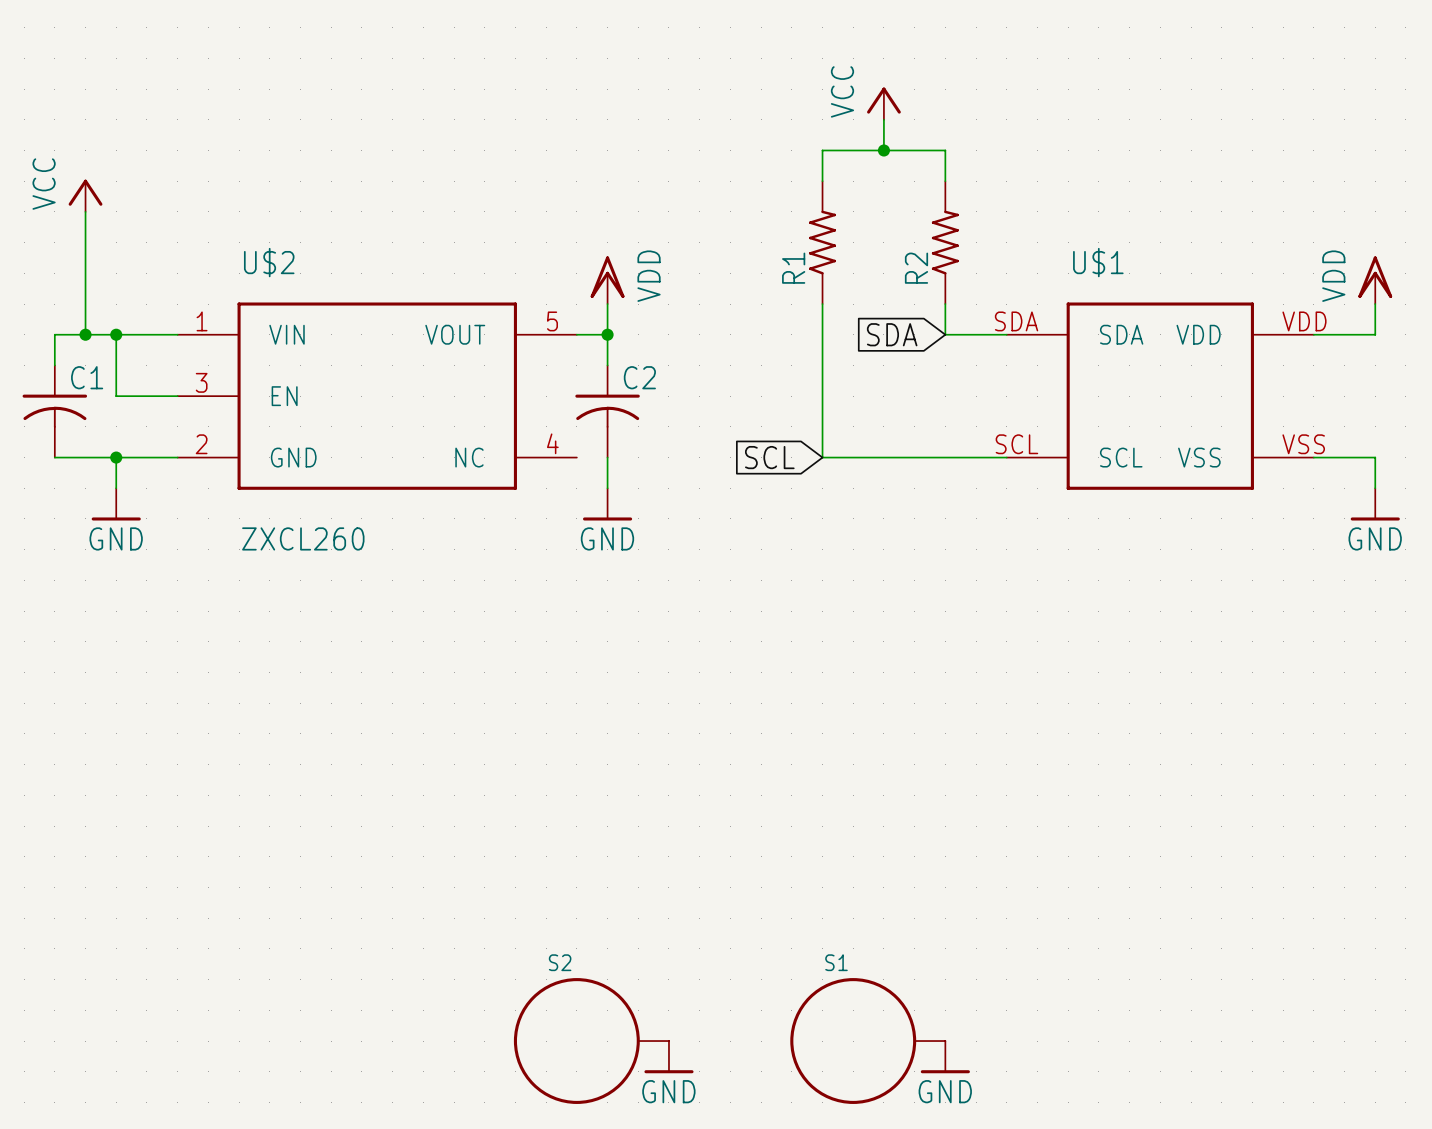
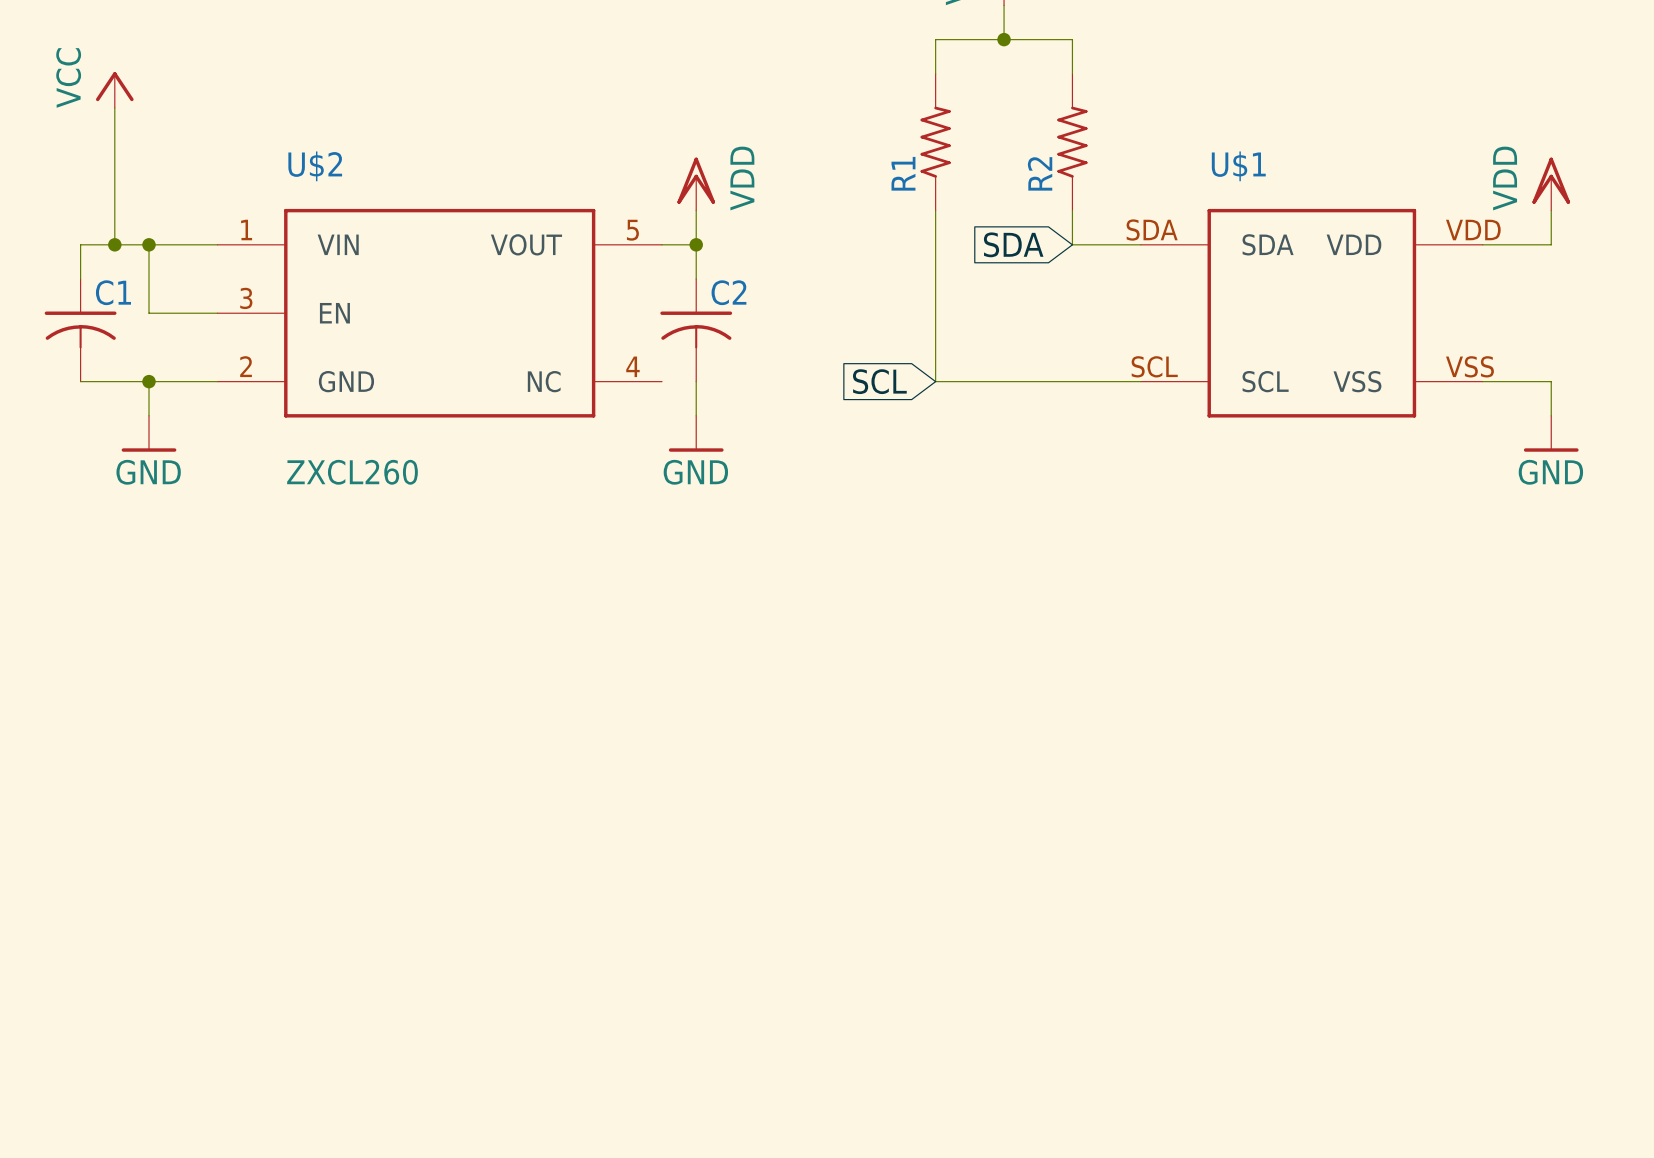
S2: (591, 1041) -> none
S1: (867, 1041) -> none
power symbol: GND (668, 1057) -> none
power symbol: GND (945, 1057) -> none

